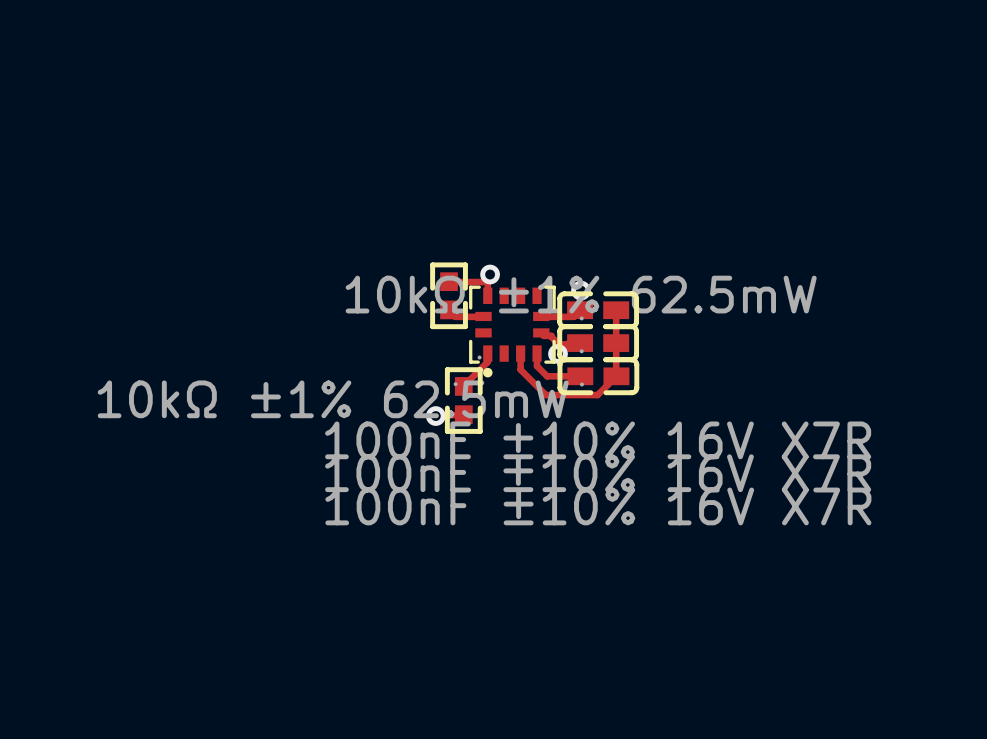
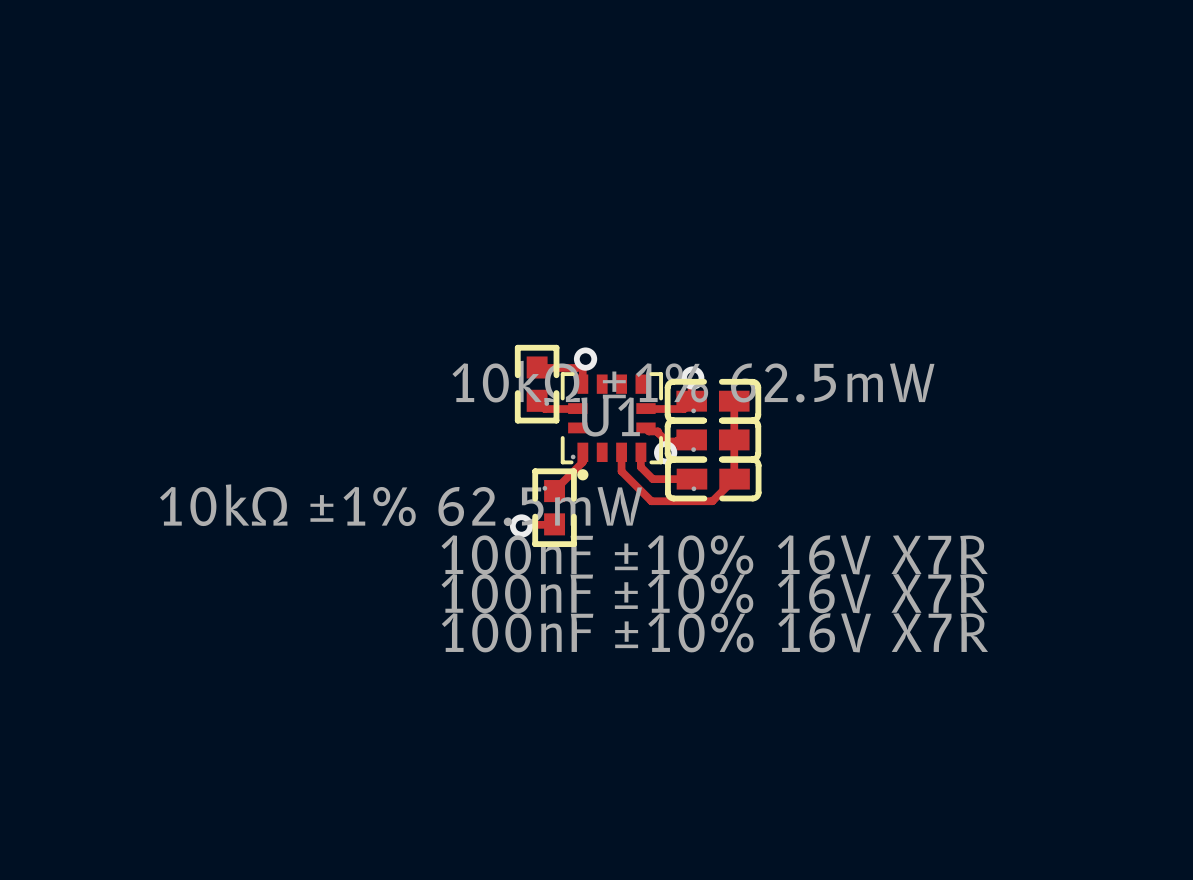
U1 name: none -> U1 (610, 417)

